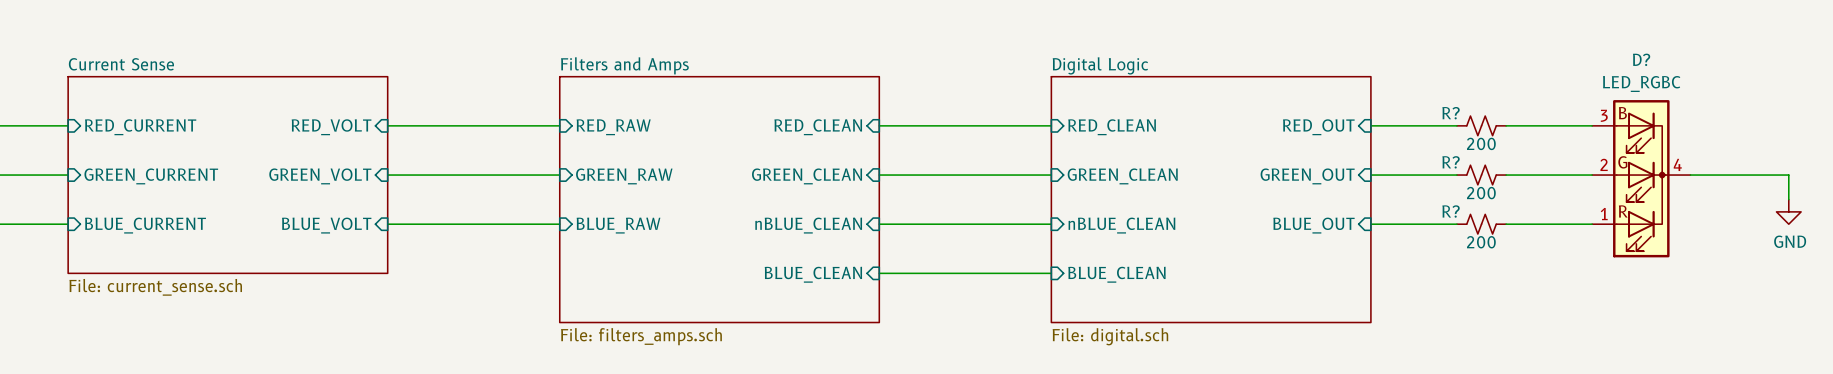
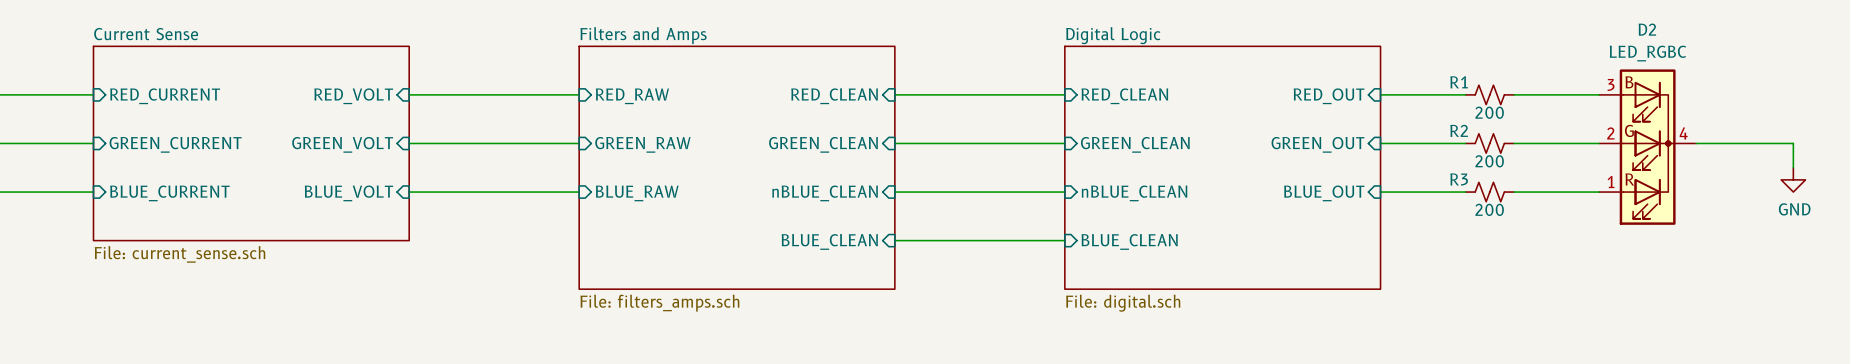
D? name: D? (1641, 59) -> D2 (1647, 29)
R? name: R? (1451, 113) -> R1 (1459, 82)
R? name: R? (1451, 162) -> R2 (1459, 130)
R? name: R? (1451, 211) -> R3 (1459, 179)

